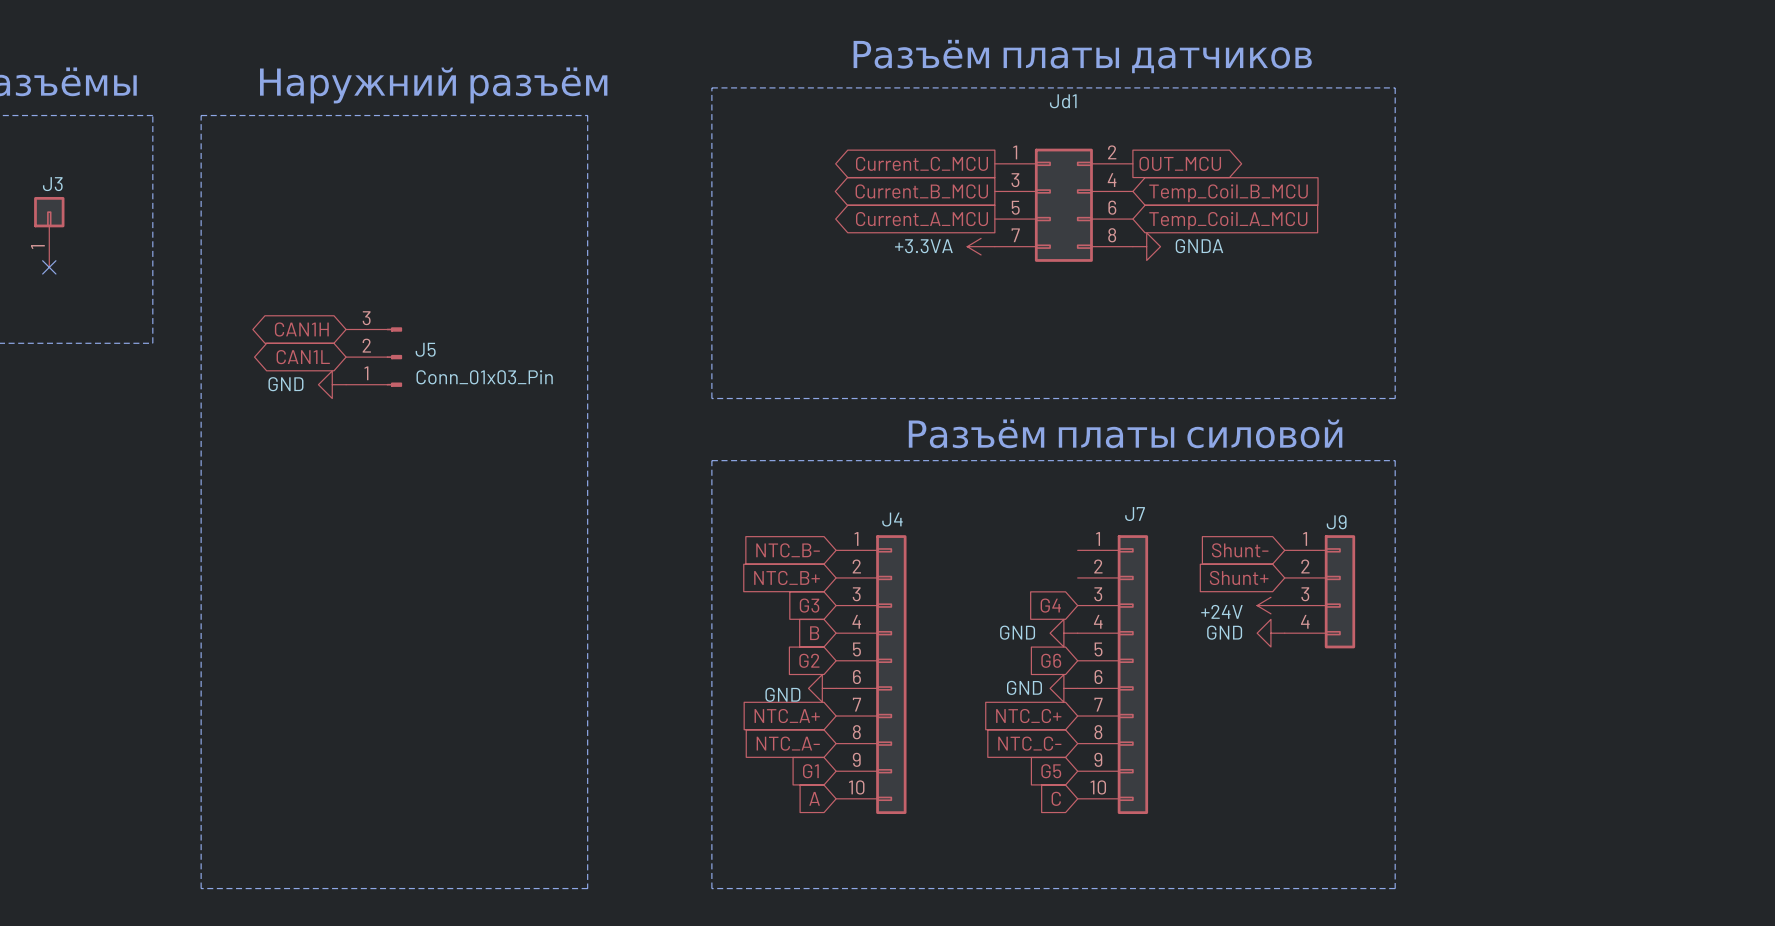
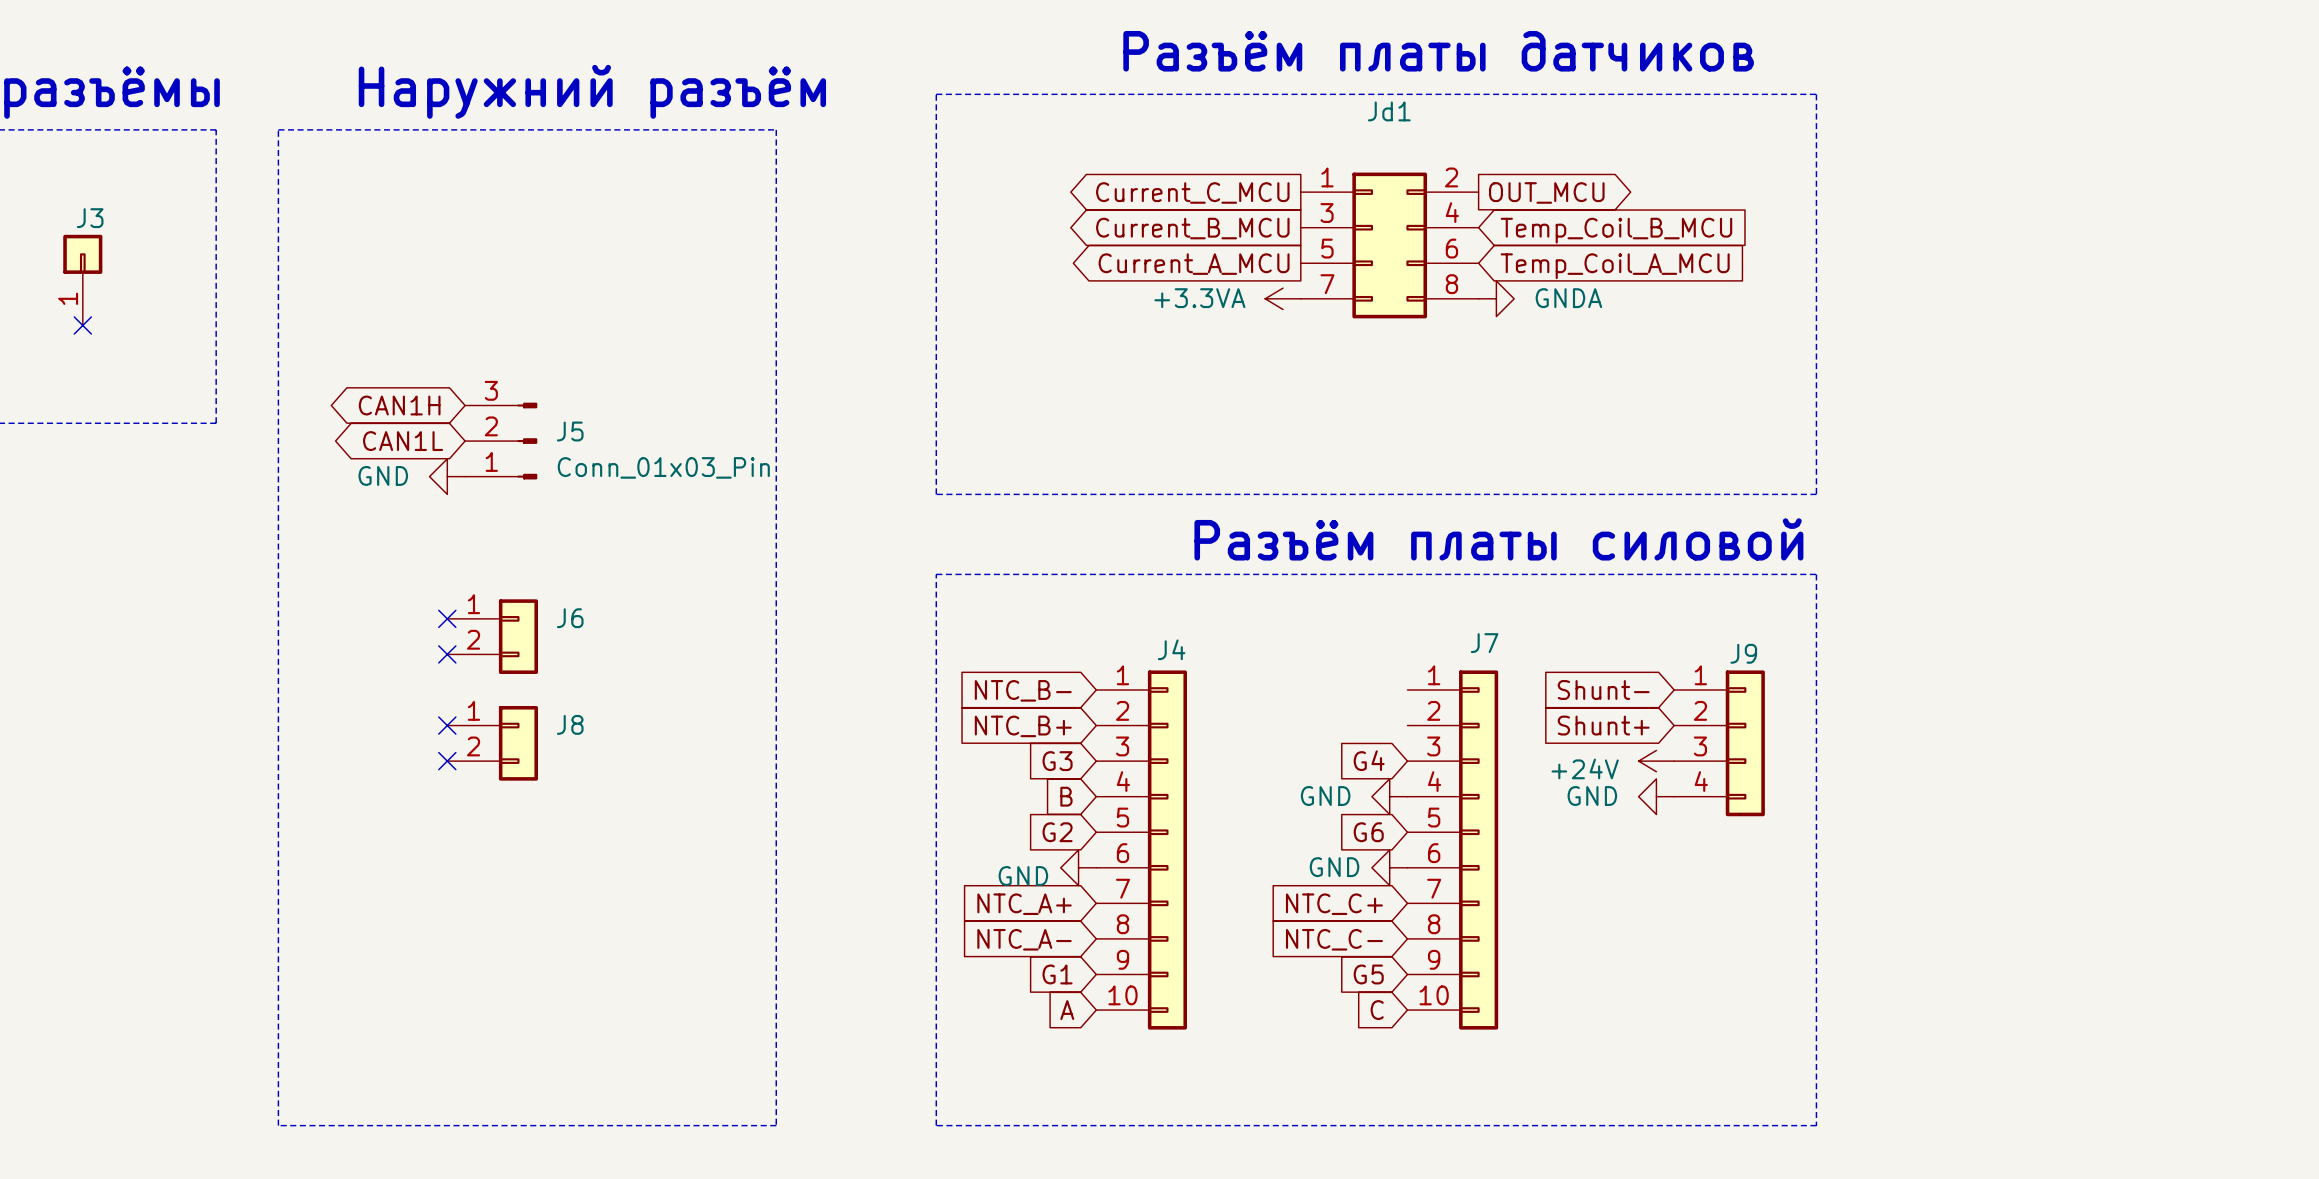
no-connect mark: none -> (447, 618)
J6: none -> (492, 636)
no-connect mark: none -> (447, 654)
no-connect mark: none -> (447, 725)
J8: none -> (492, 743)
no-connect mark: none -> (447, 761)

